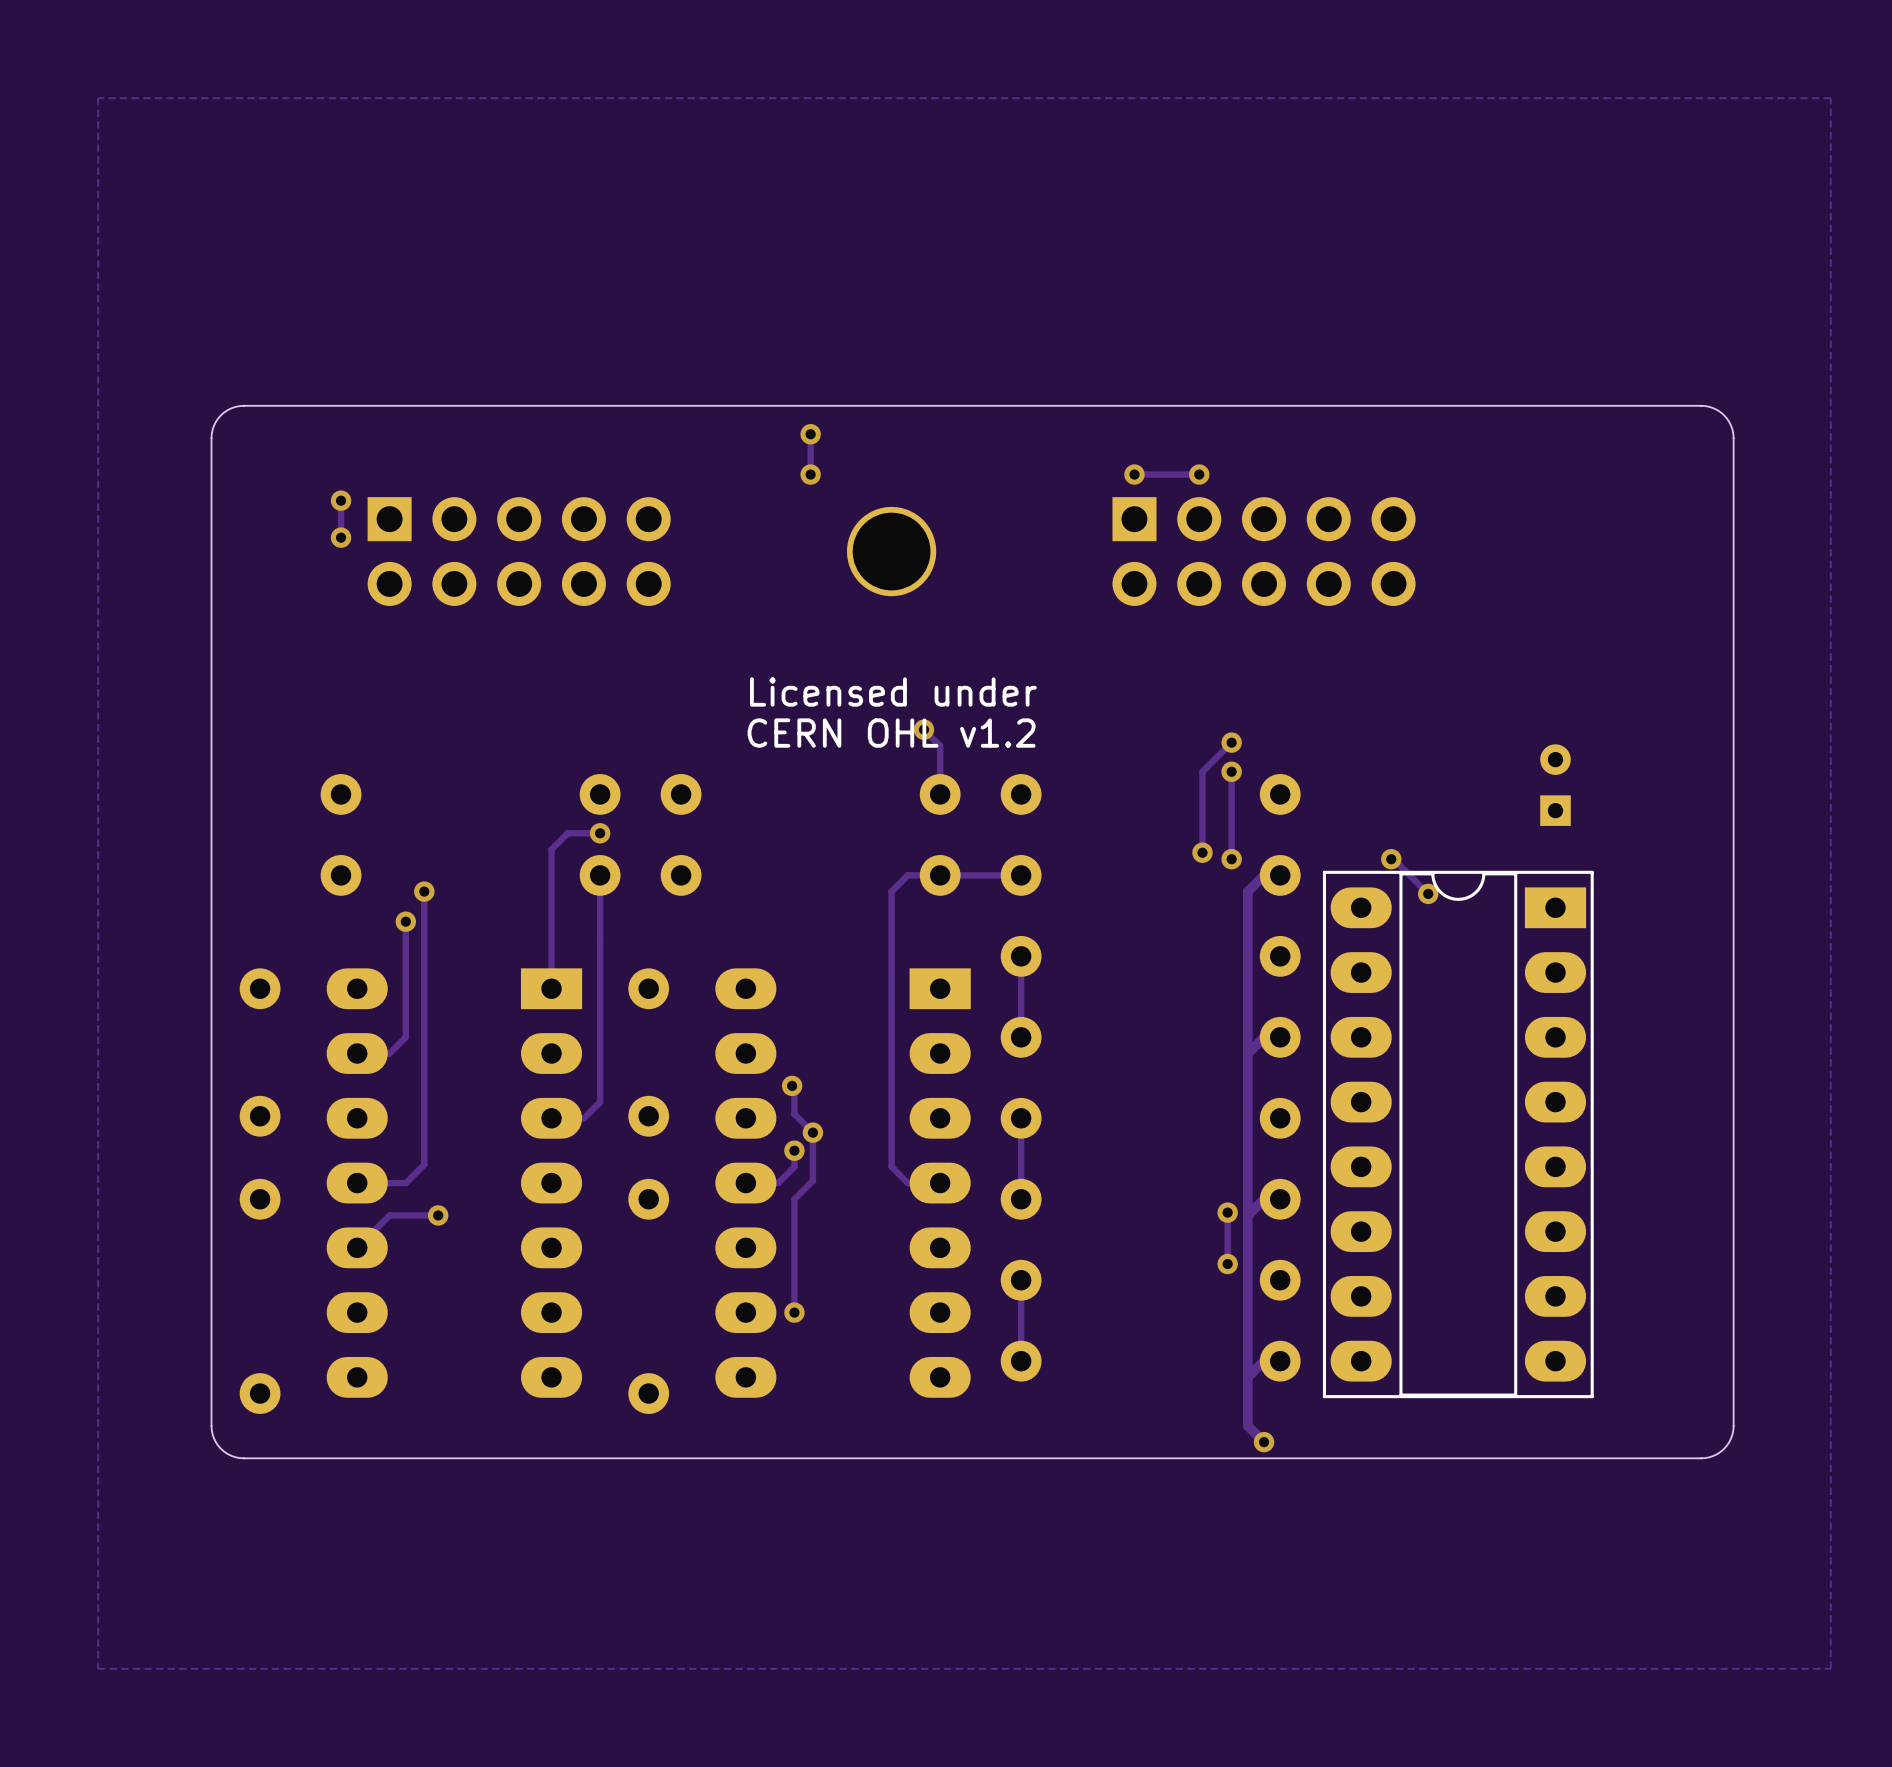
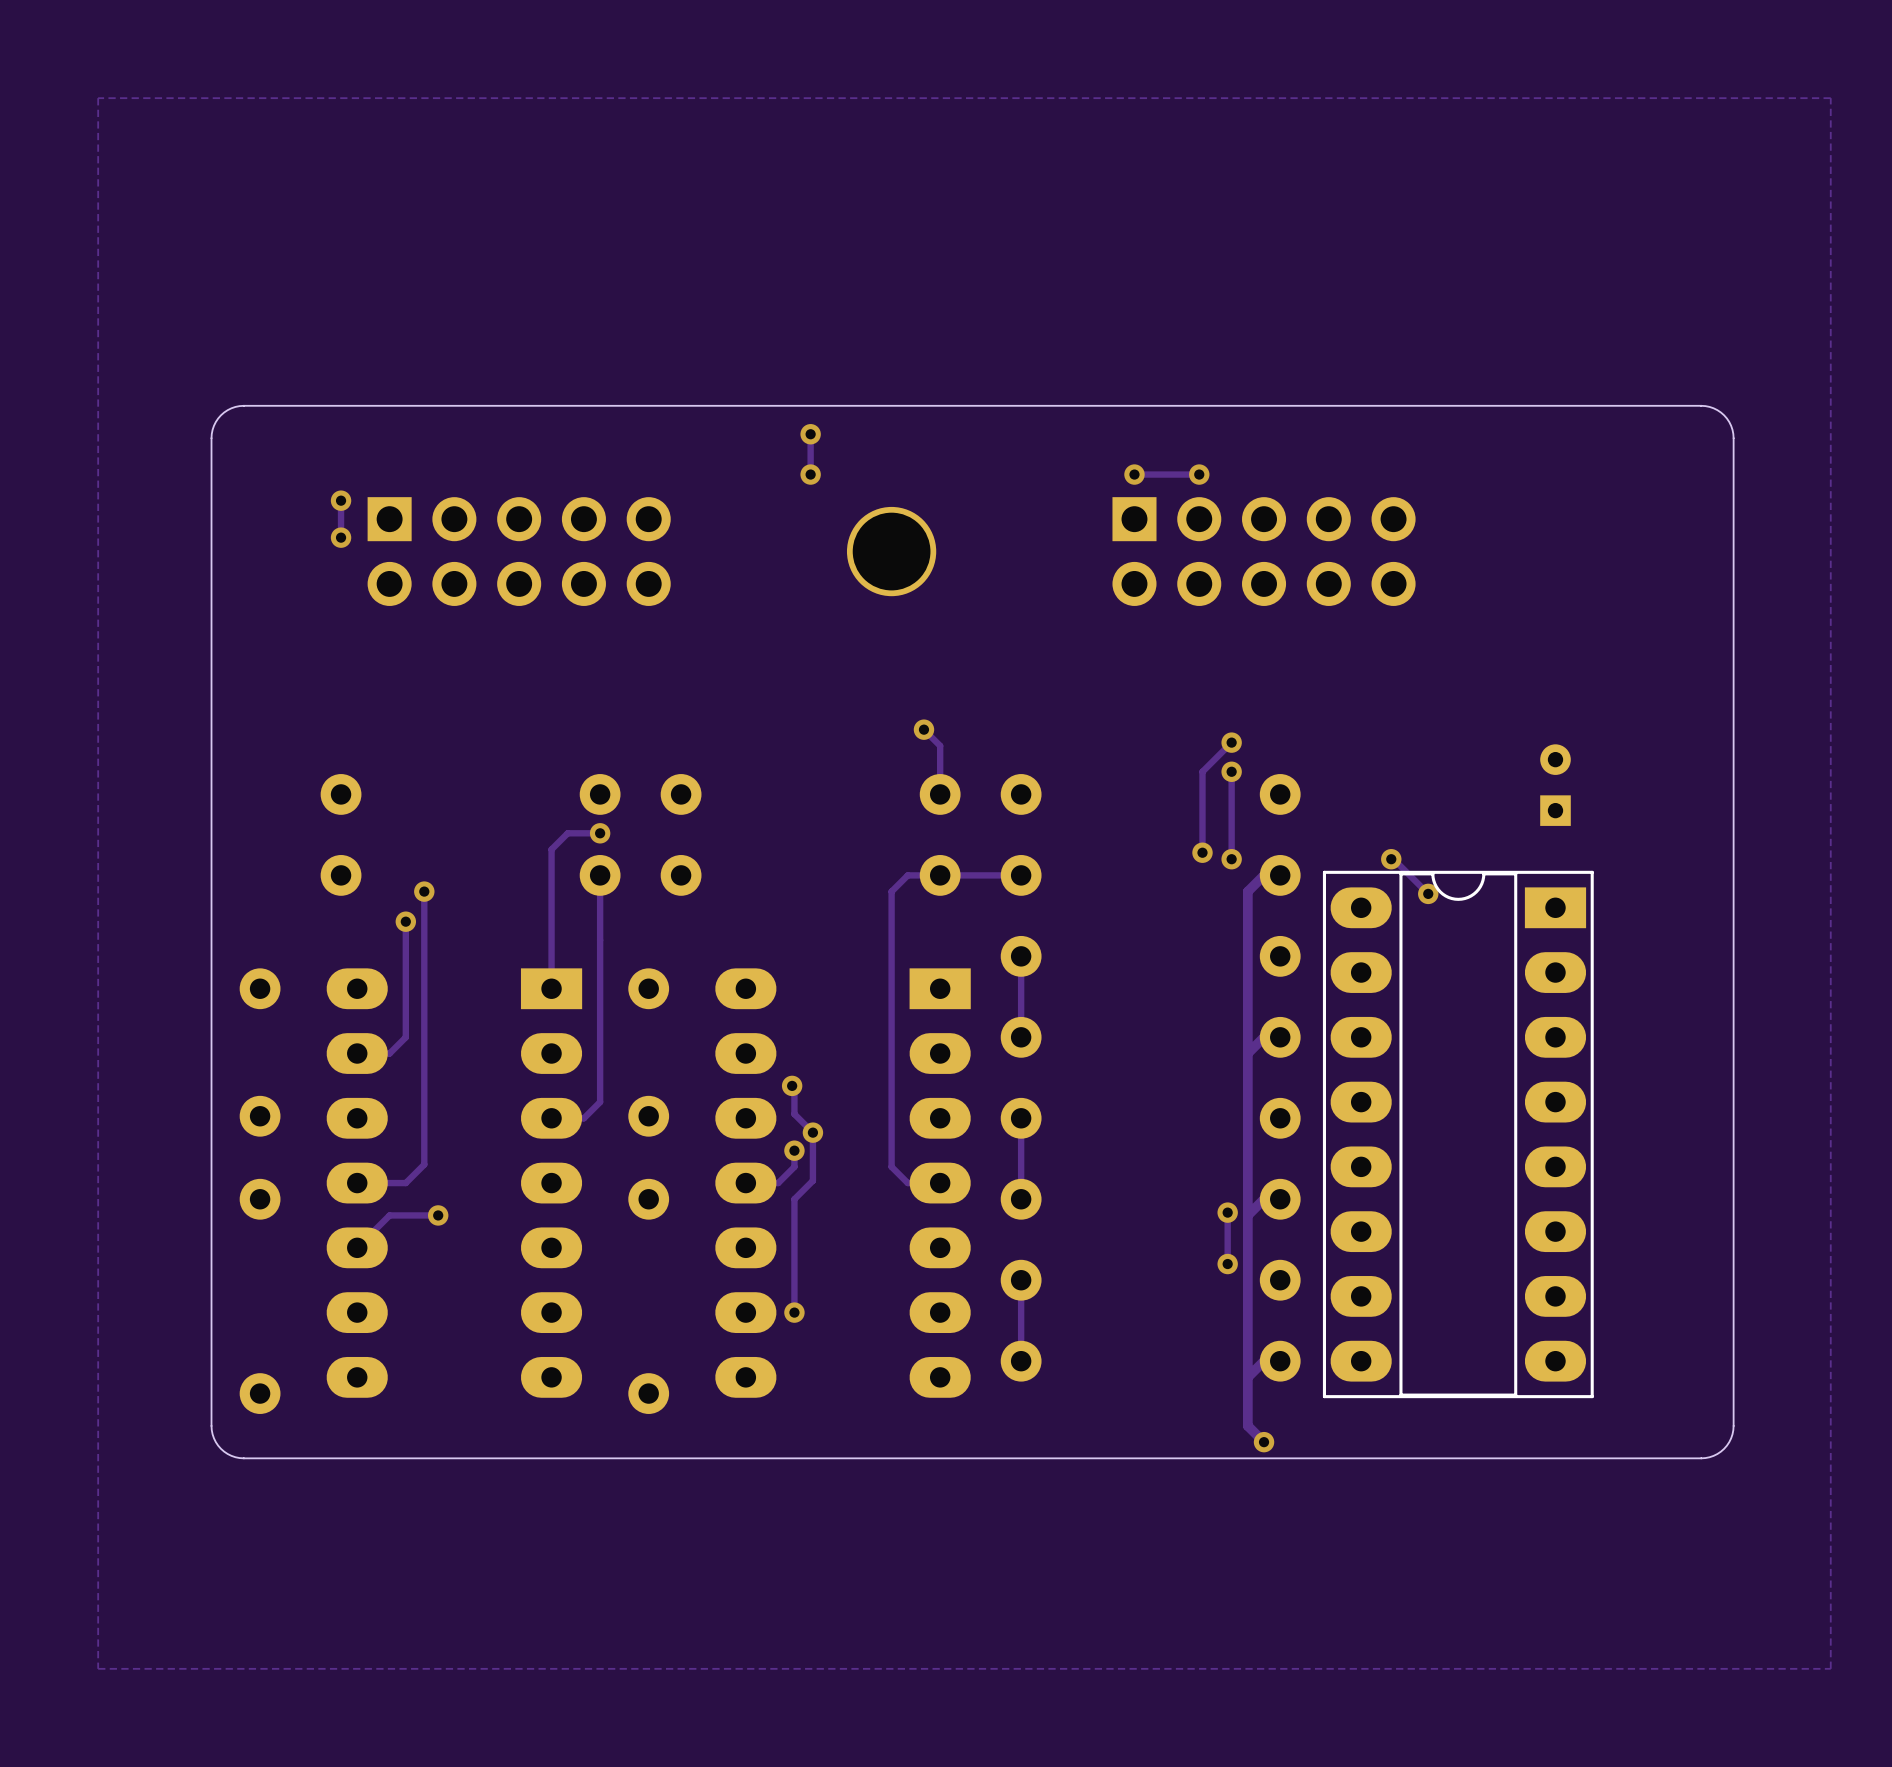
text: Licensed under (893, 691) -> none
text: CERN OHL v1.2 (891, 733) -> none

